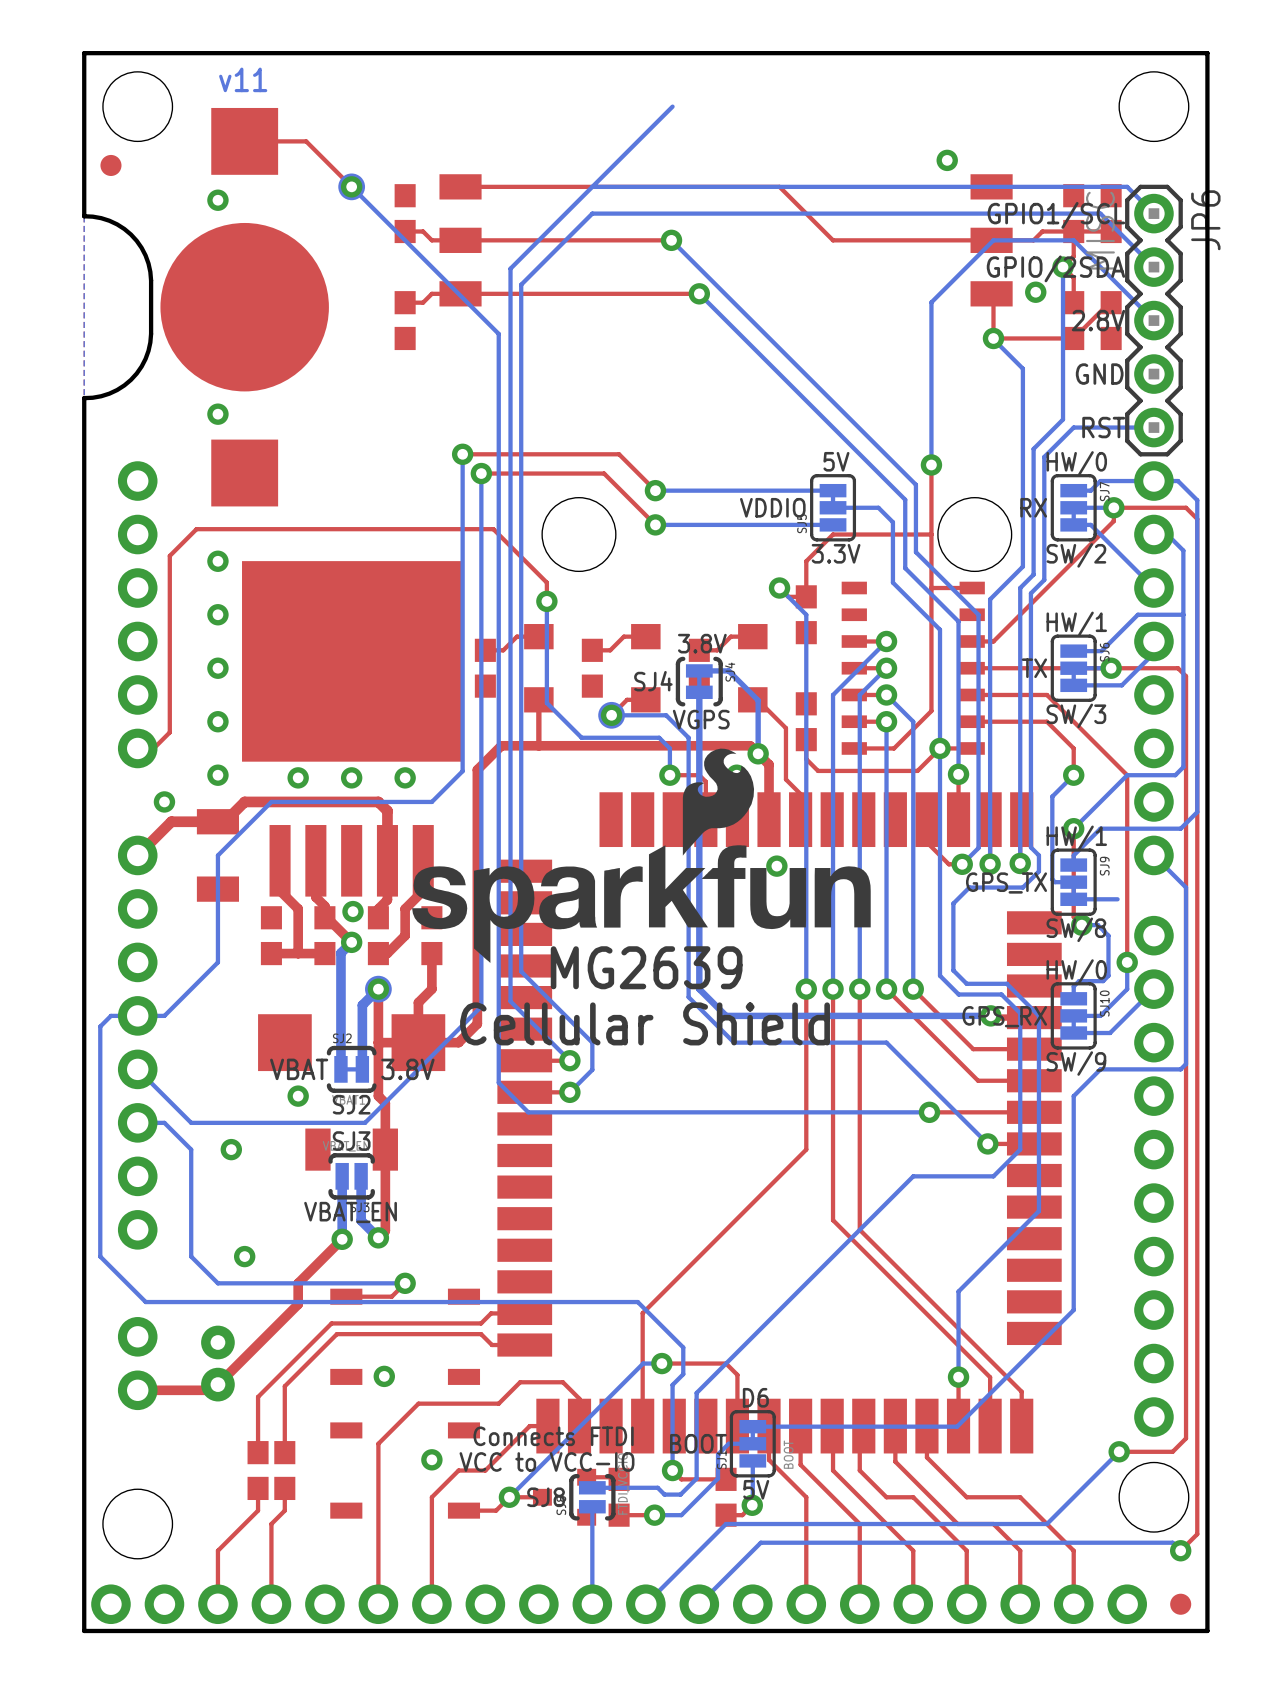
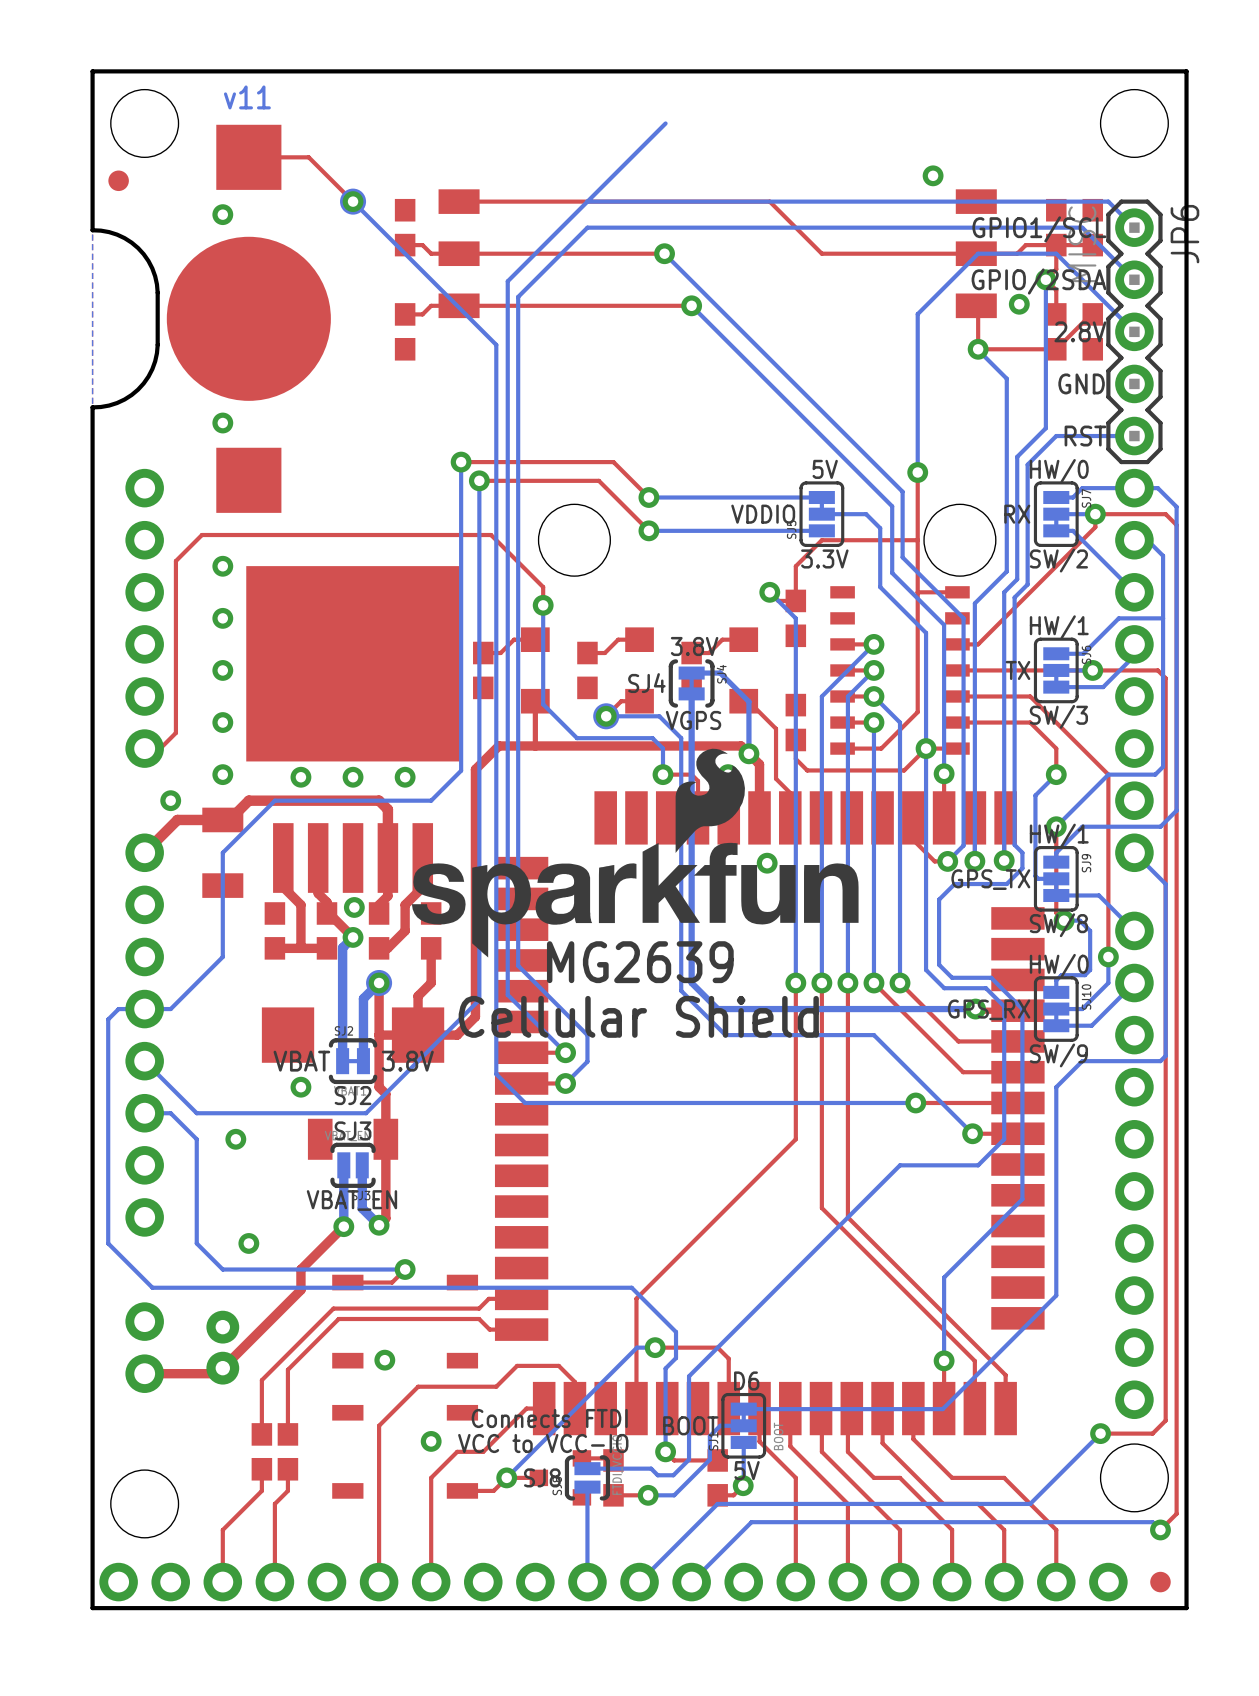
bottom track: none -> (1099, 895) (1134, 930)

